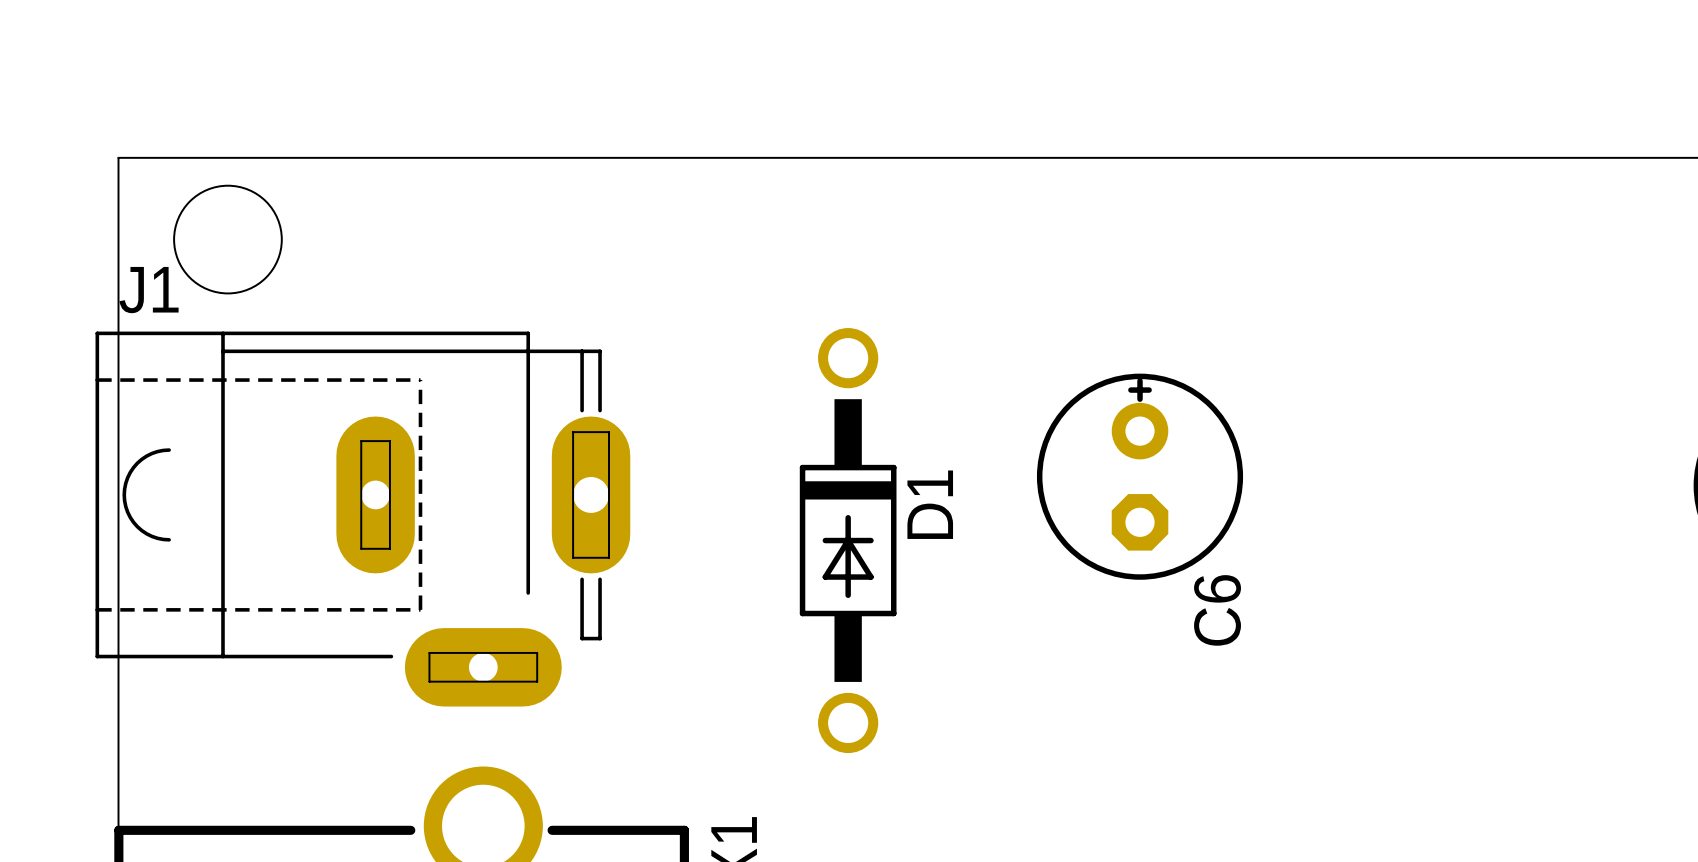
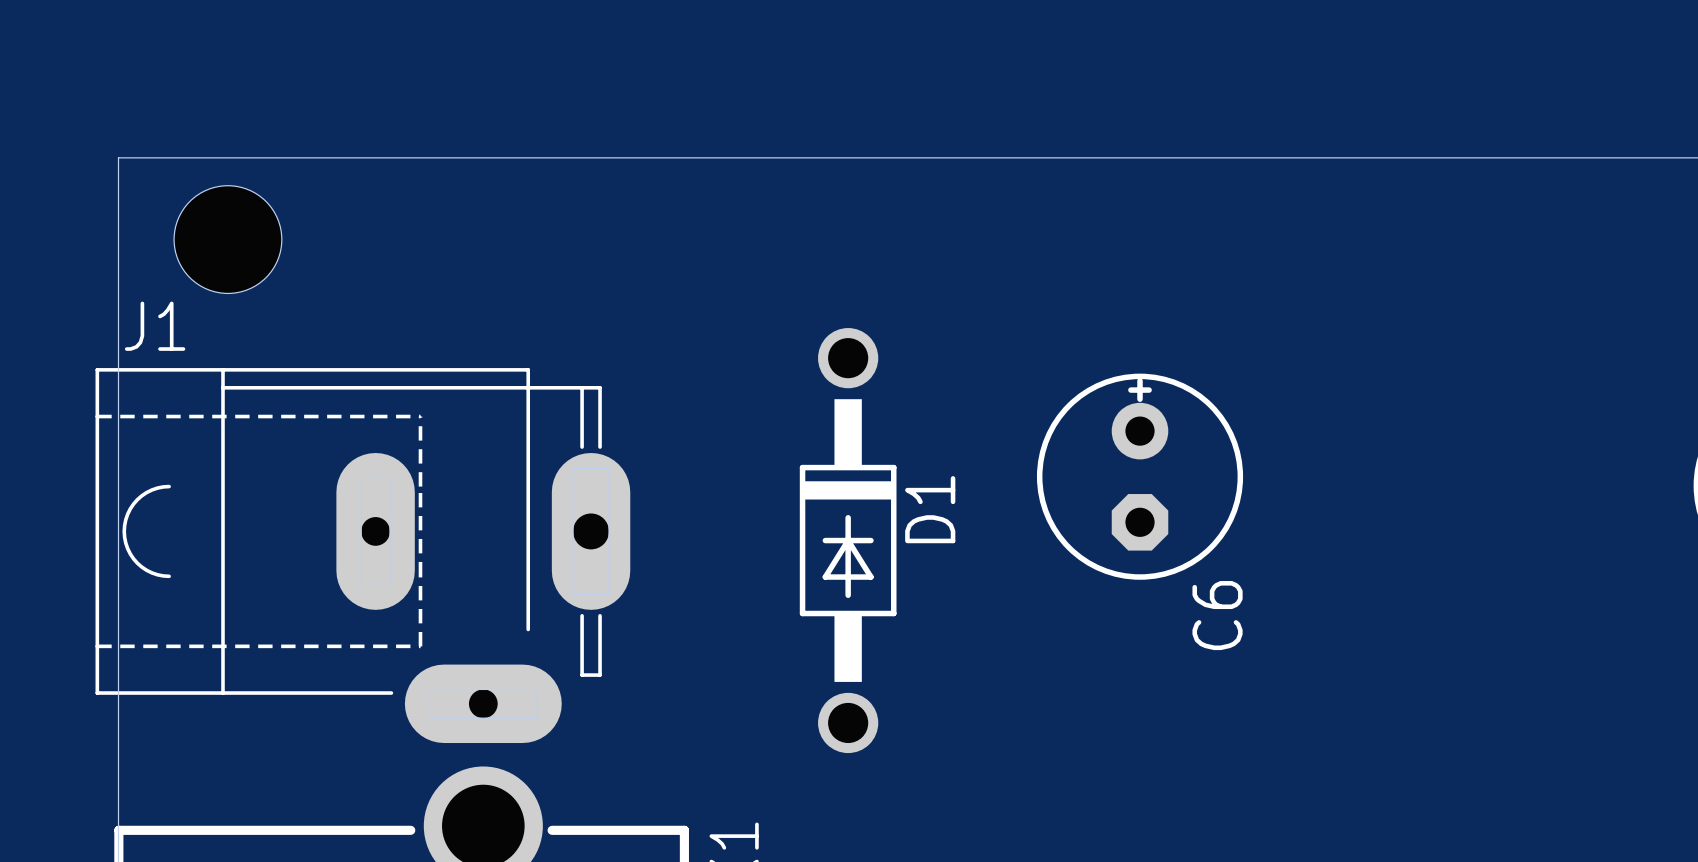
J1 position: (362, 519) -> (362, 555)

